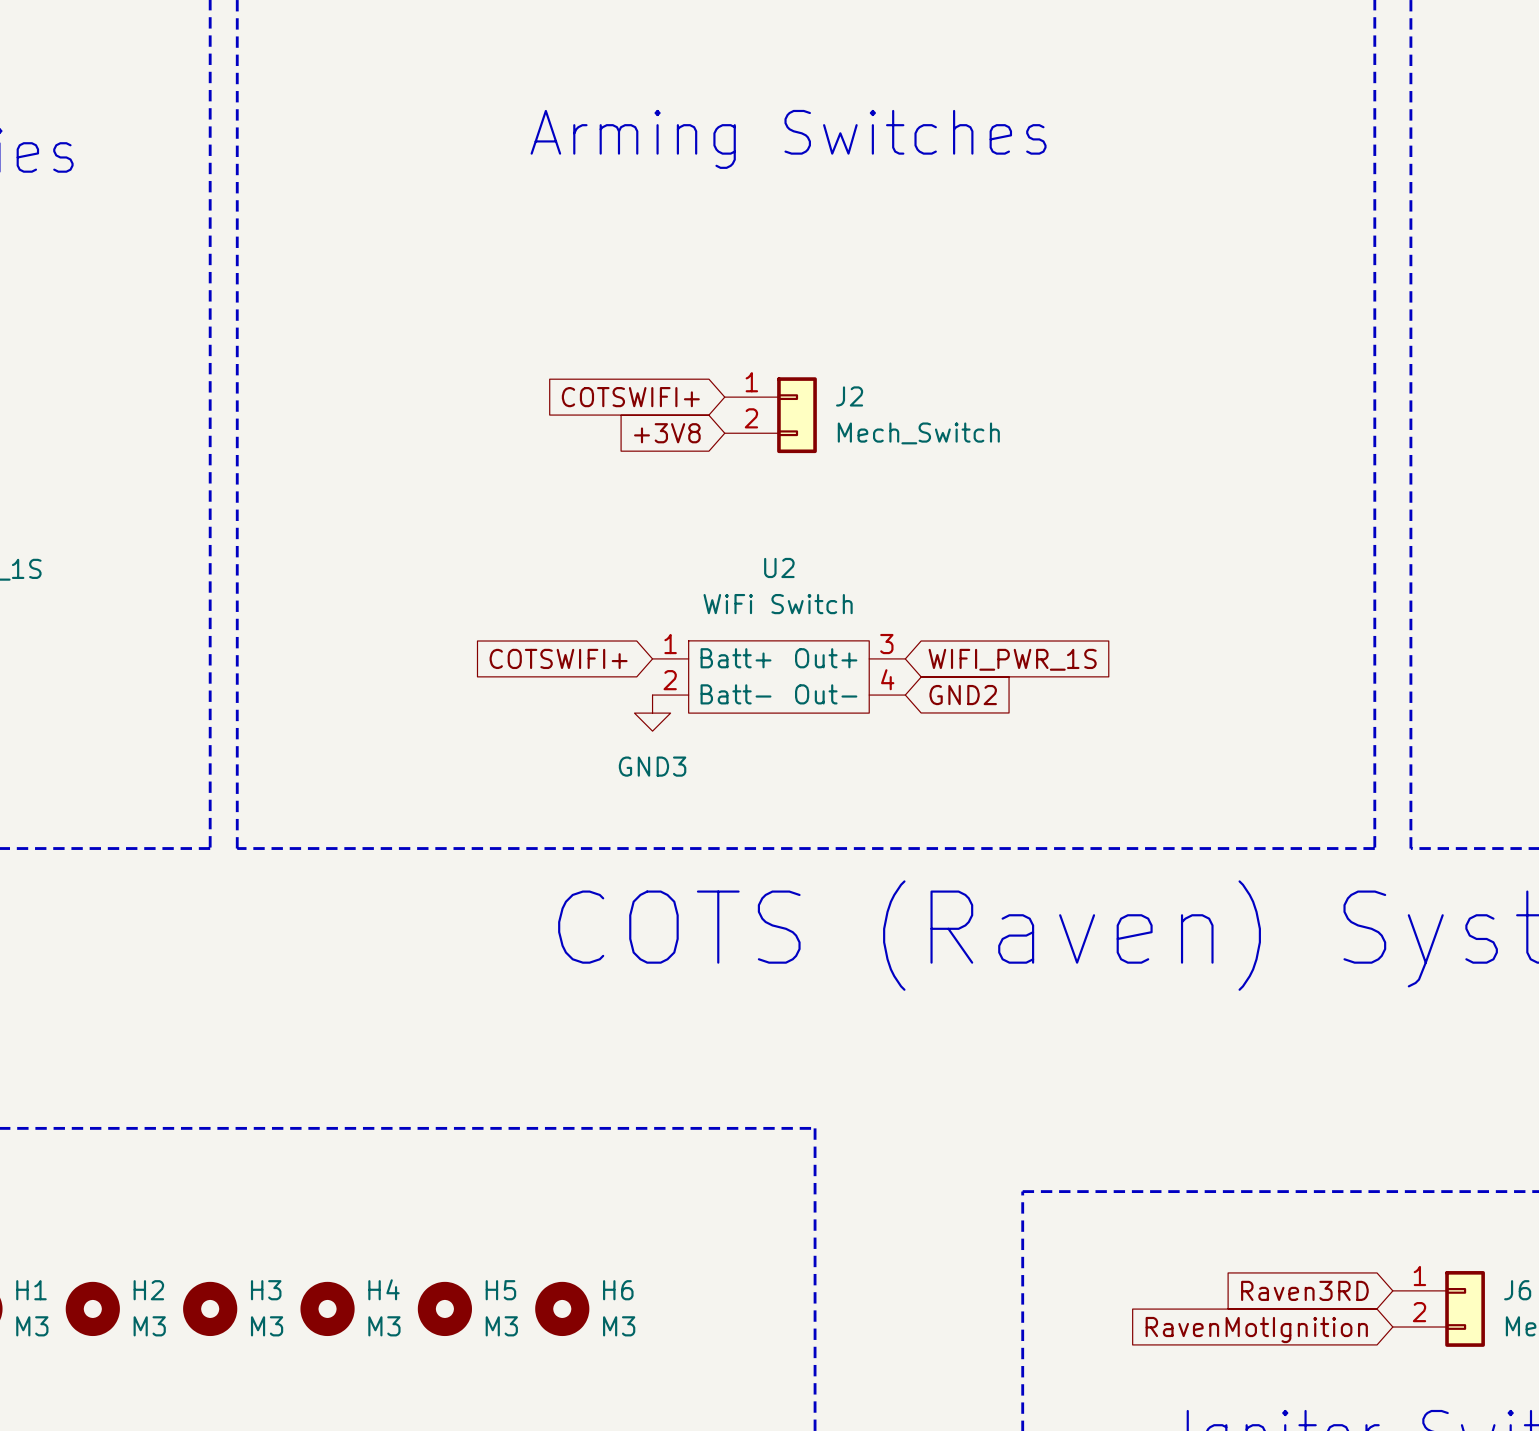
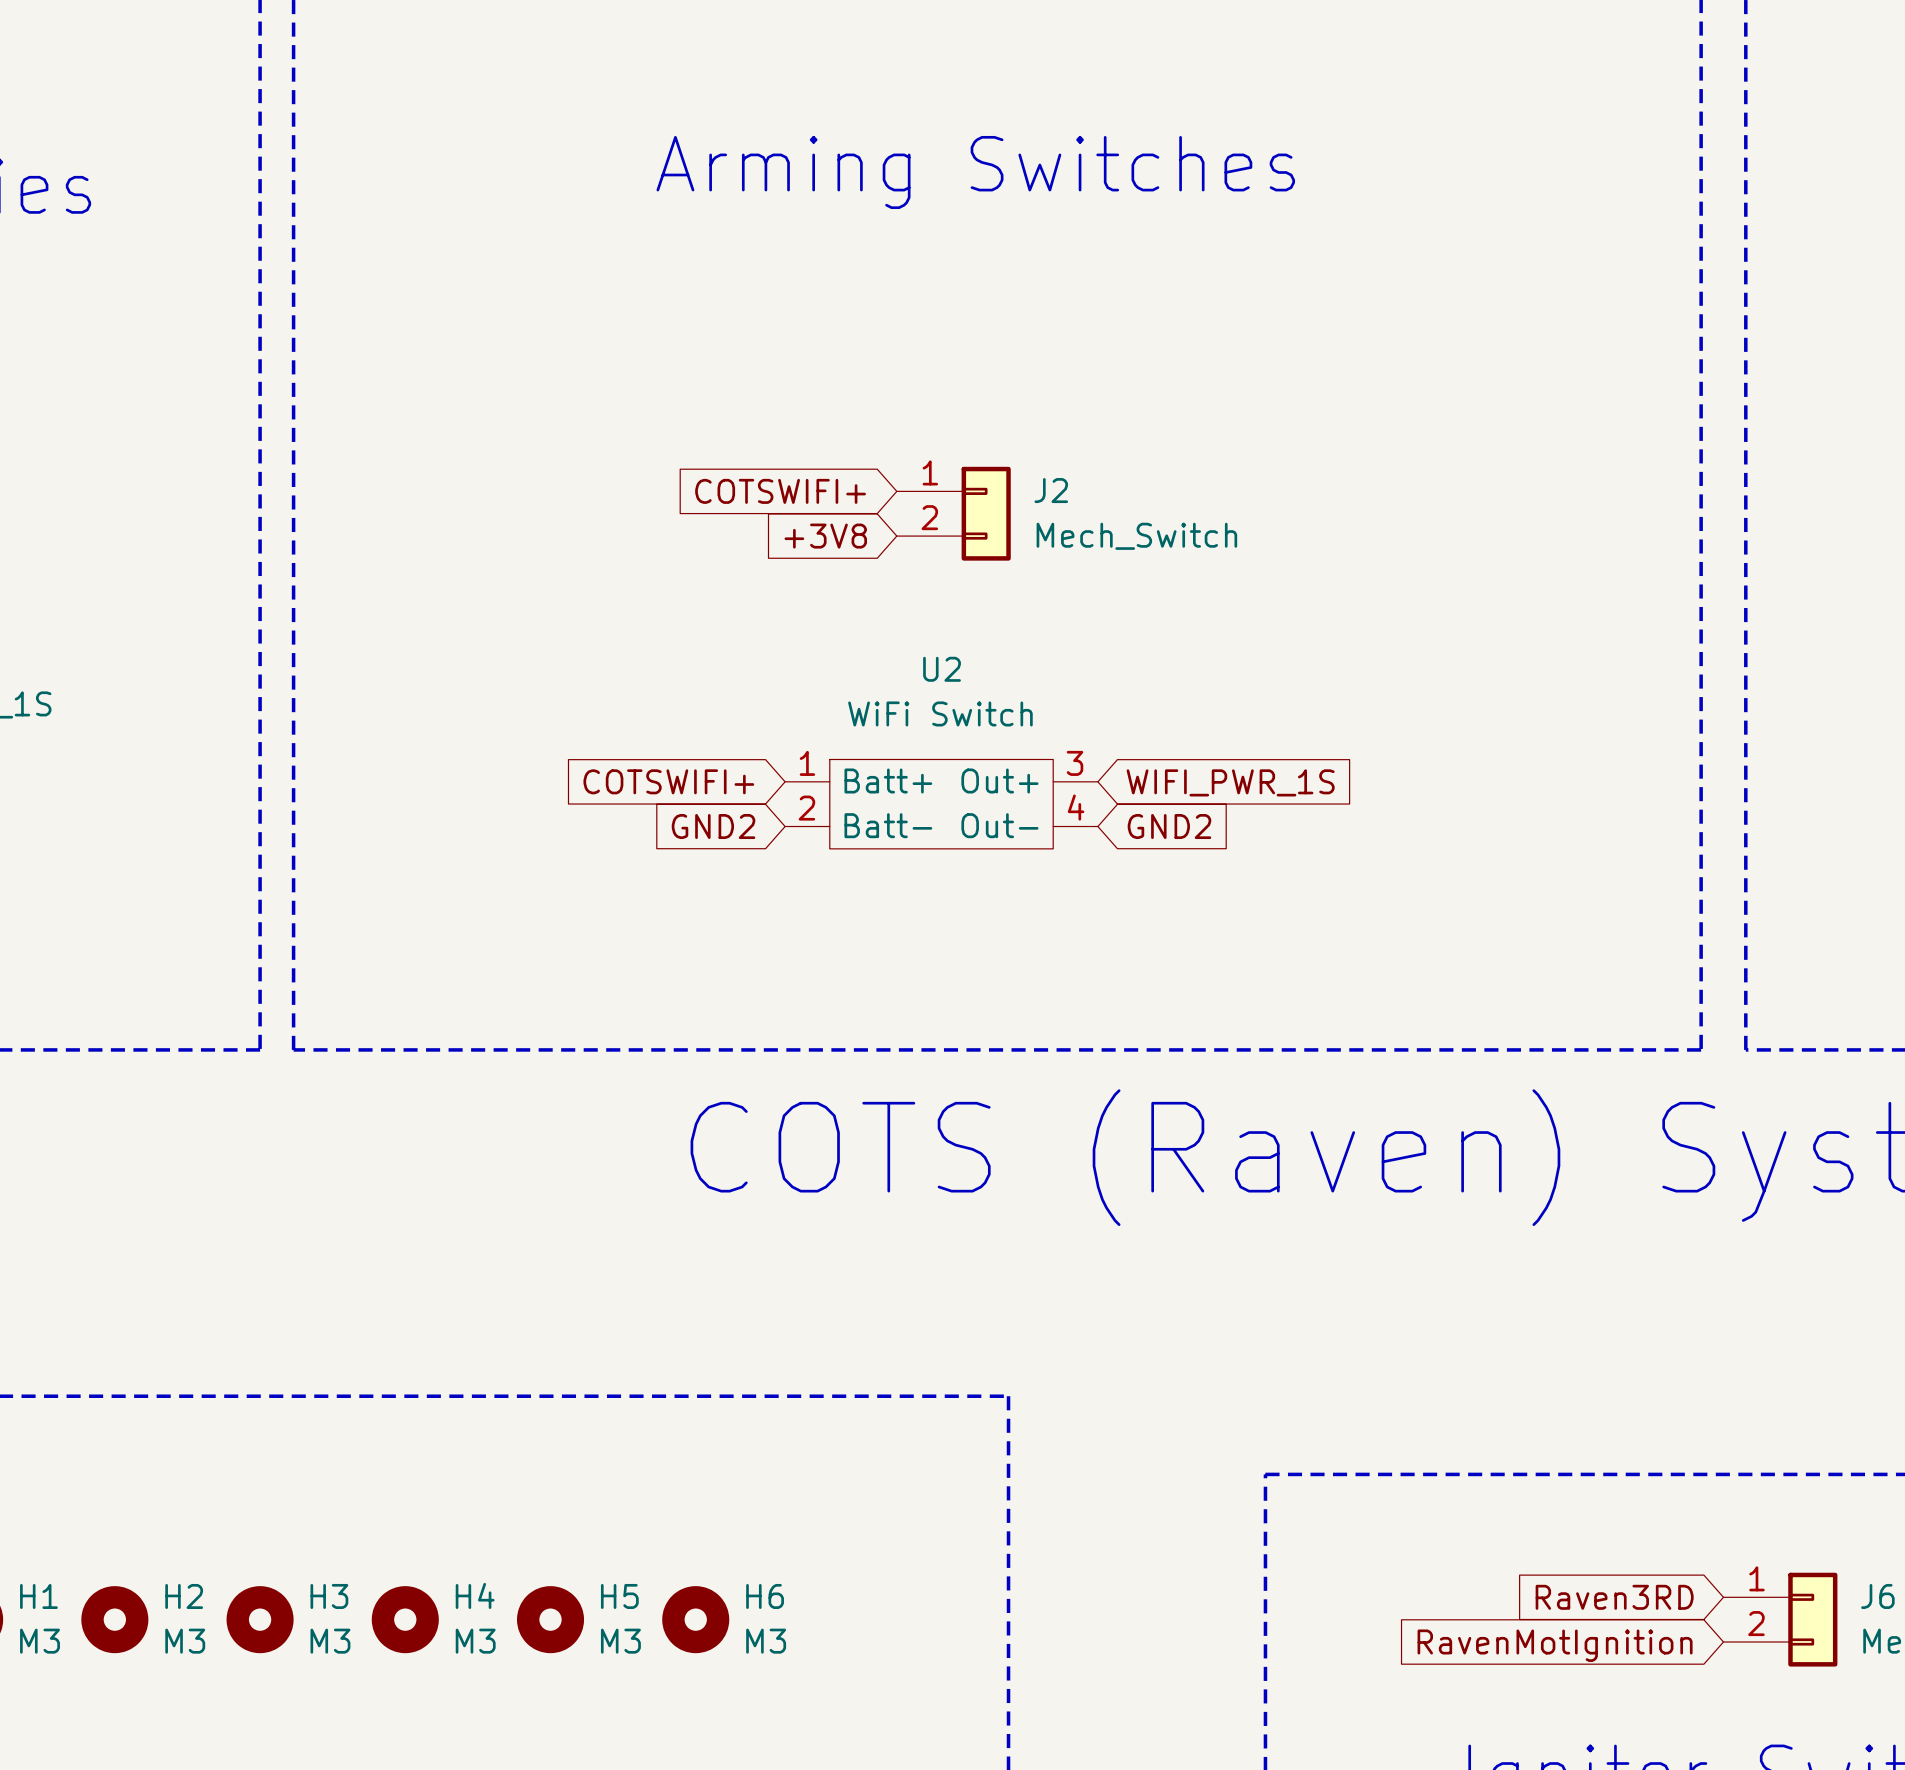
global label position: COTSWIFI+ (558, 658) -> COTSWIFI+ (668, 781)
global label position: WIFI_PWR_1S (1012, 659) -> WIFI_PWR_1S (1230, 782)
global label: none -> GND2 (713, 826)
U2 position: (778, 676) -> (941, 804)
global label position: GND2 (963, 695) -> GND2 (1169, 826)
power symbol: GND3 (652, 713) -> none

